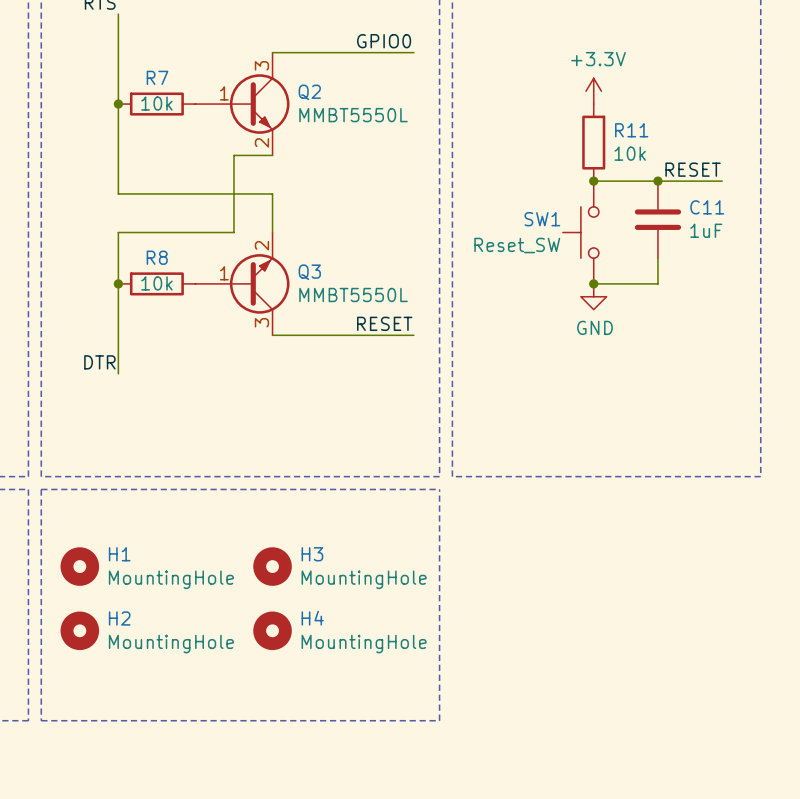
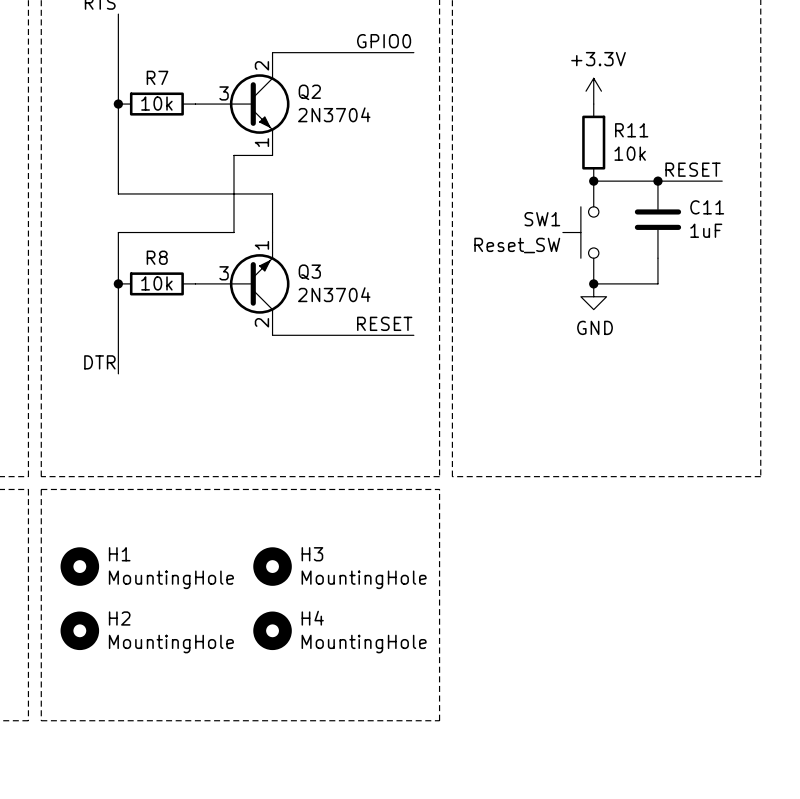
Q2 pin number: 3 (261, 65) -> 2 (261, 65)
Q2 pin number: 1 (224, 93) -> 3 (224, 93)
Q2 value: MMBT5550L (353, 115) -> 2N3704 (334, 114)
Q2 pin number: 2 (261, 142) -> 1 (261, 142)
Q3 pin number: 2 (261, 245) -> 1 (261, 245)
Q3 pin number: 1 (224, 273) -> 3 (224, 273)
Q3 value: MMBT5550L (353, 294) -> 2N3704 (334, 294)
Q3 pin number: 3 (261, 322) -> 2 (261, 322)

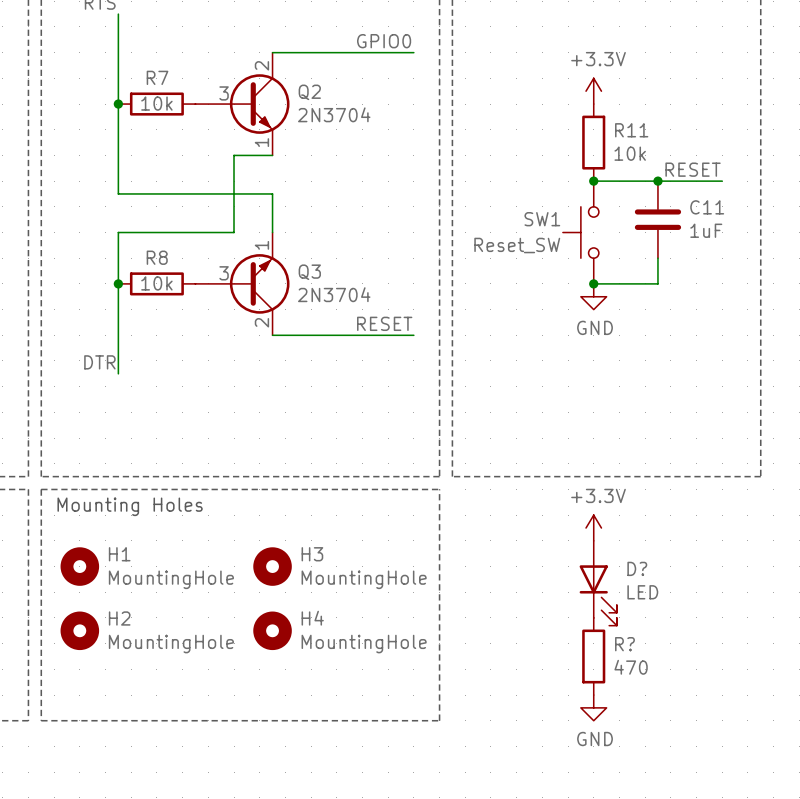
text: none -> Mounting Holes (130, 506)
power symbol: none -> +3.3V (593, 528)
D?: none -> LED (598, 583)
R?: none -> 470 (593, 656)
power symbol: none -> GND (593, 707)

